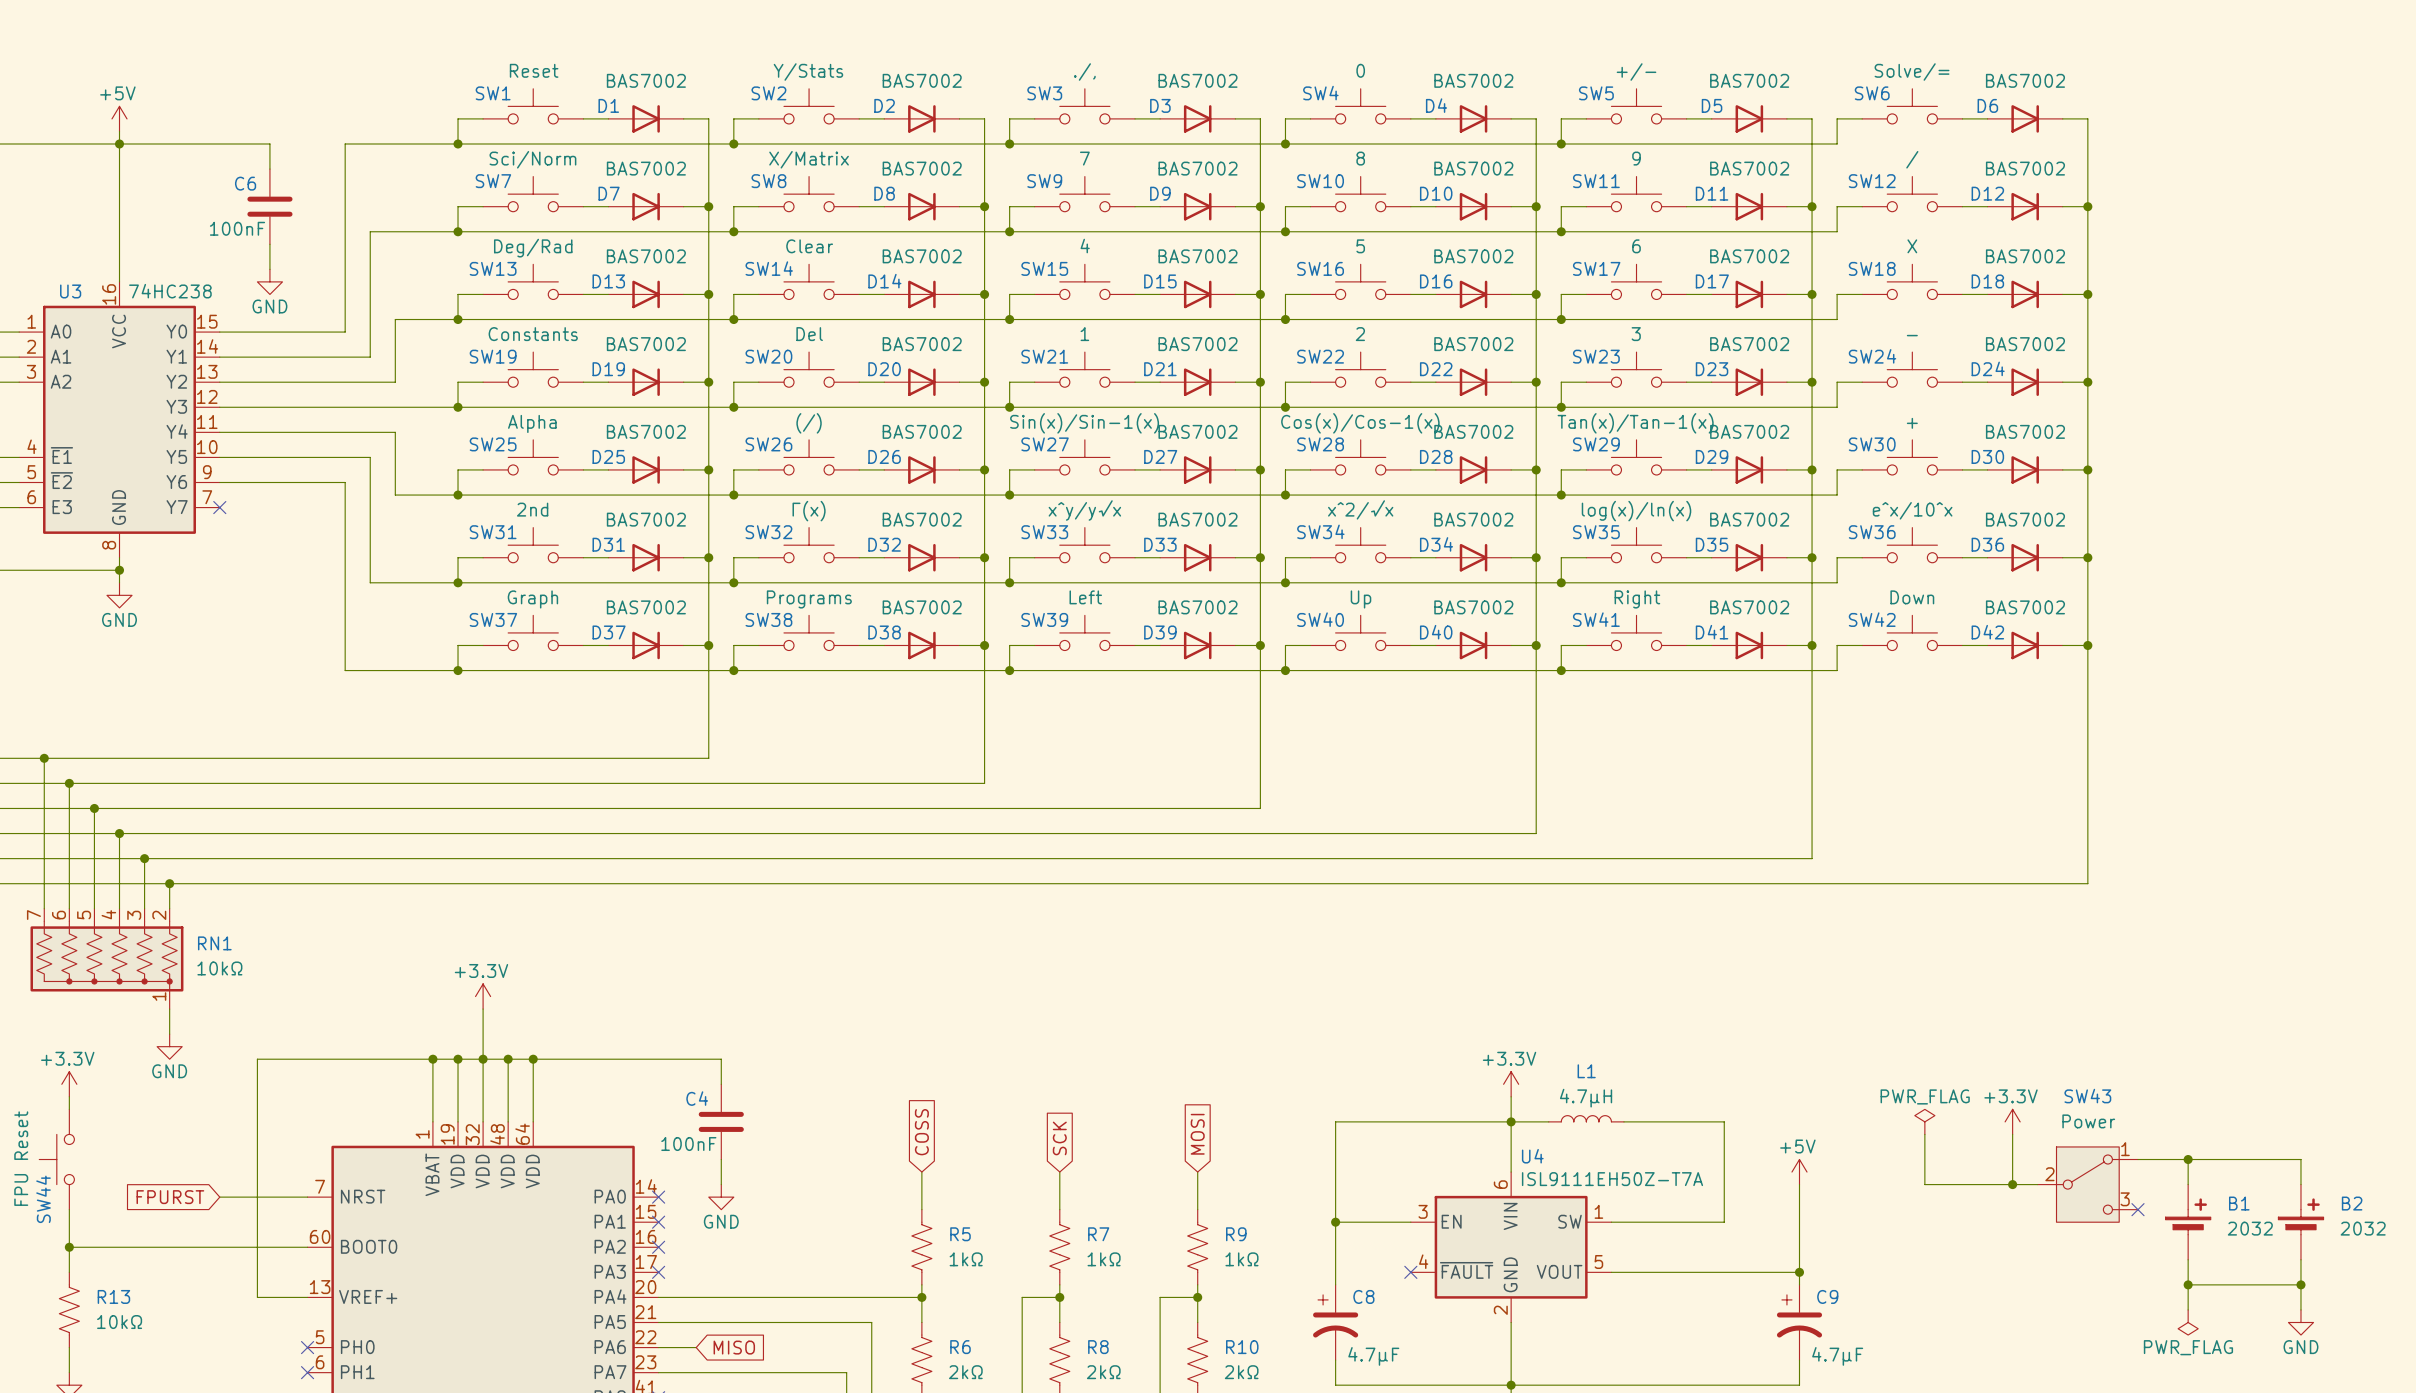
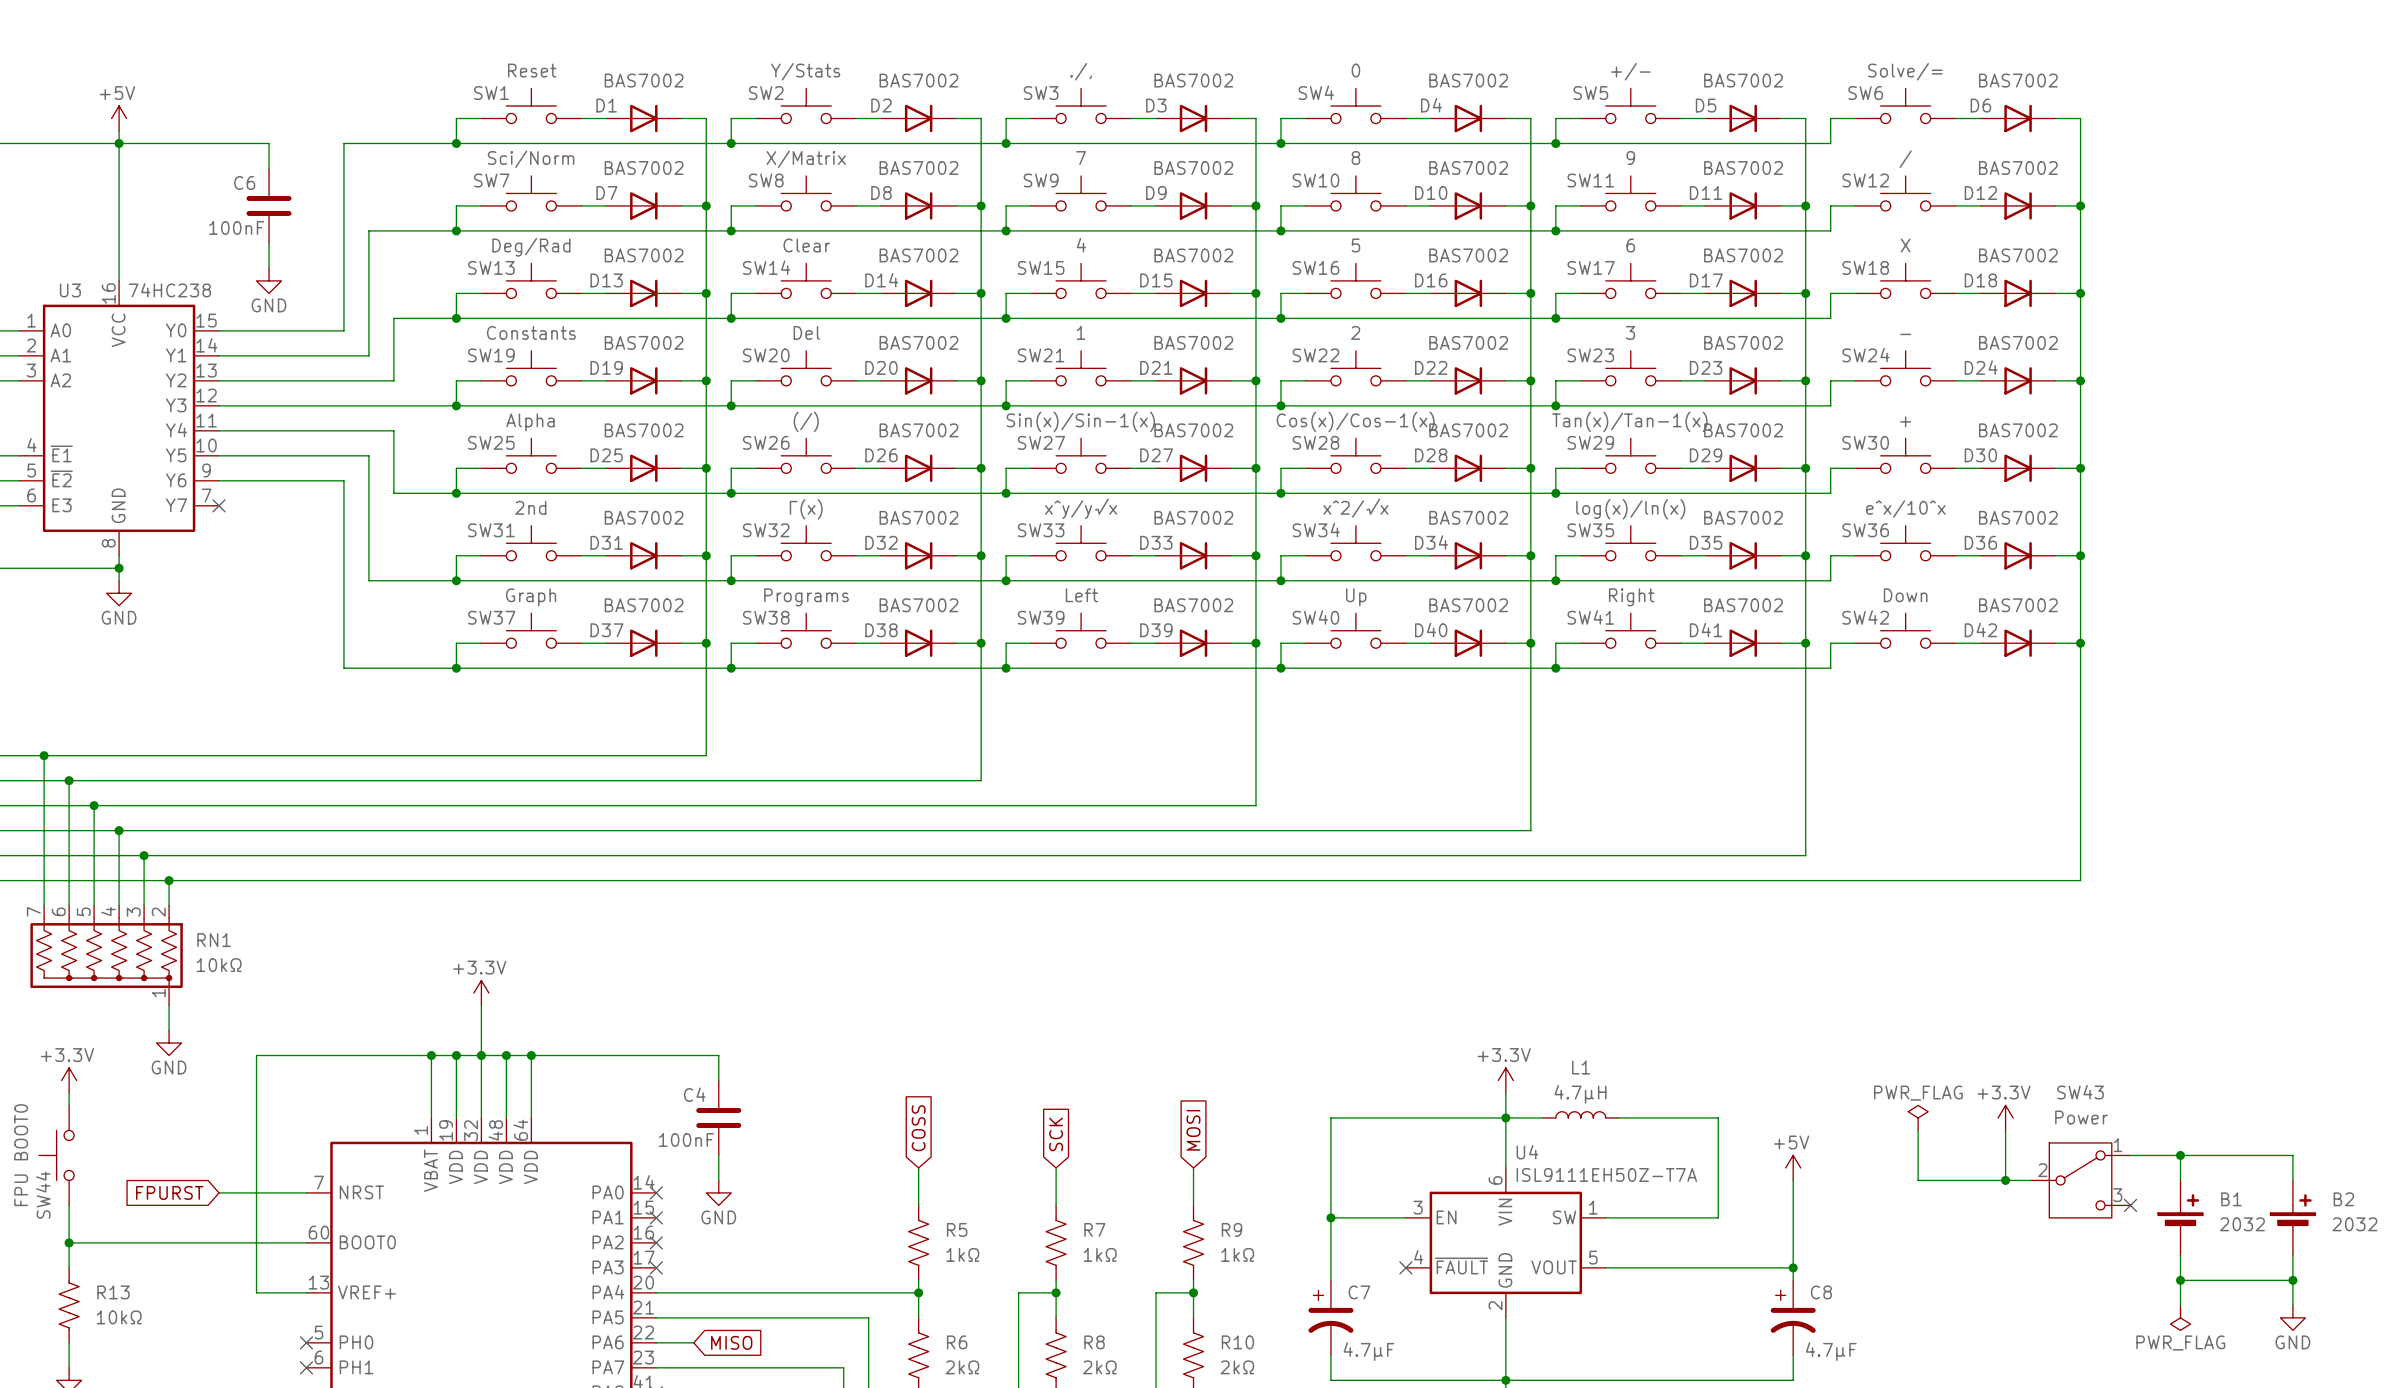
SW44 value: FPU Reset (21, 1158) -> FPU BOOT0 (21, 1155)
C8 name: C8 (1363, 1296) -> C7 (1359, 1292)
C9 name: C9 (1827, 1296) -> C8 (1821, 1292)

